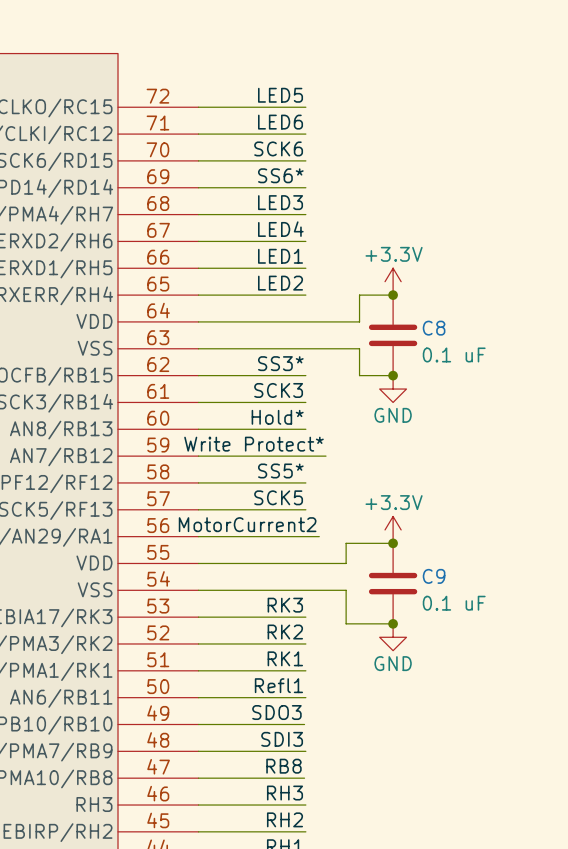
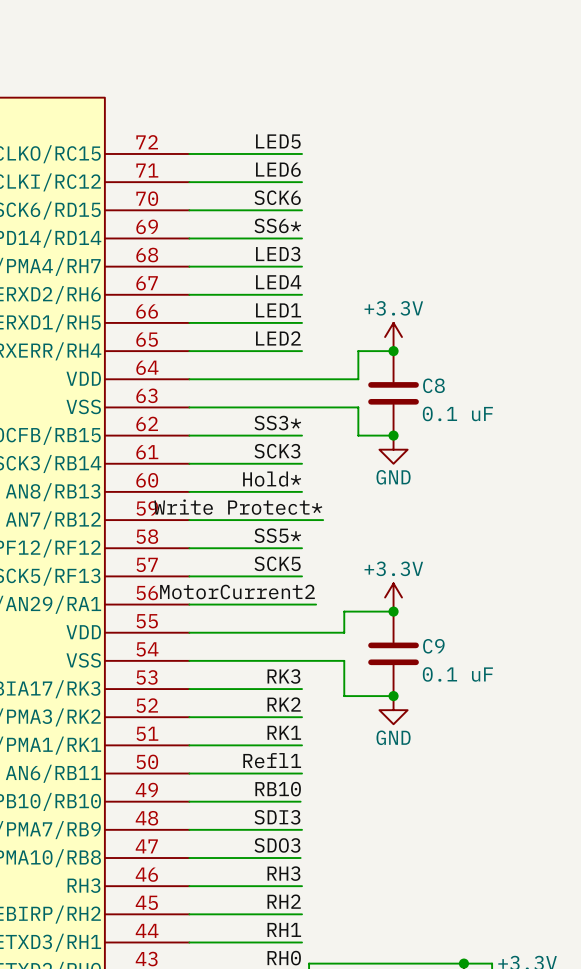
label: SDO3 (276, 712) -> RB10 (278, 789)
label: RB8 (283, 766) -> SDO3 (277, 845)

